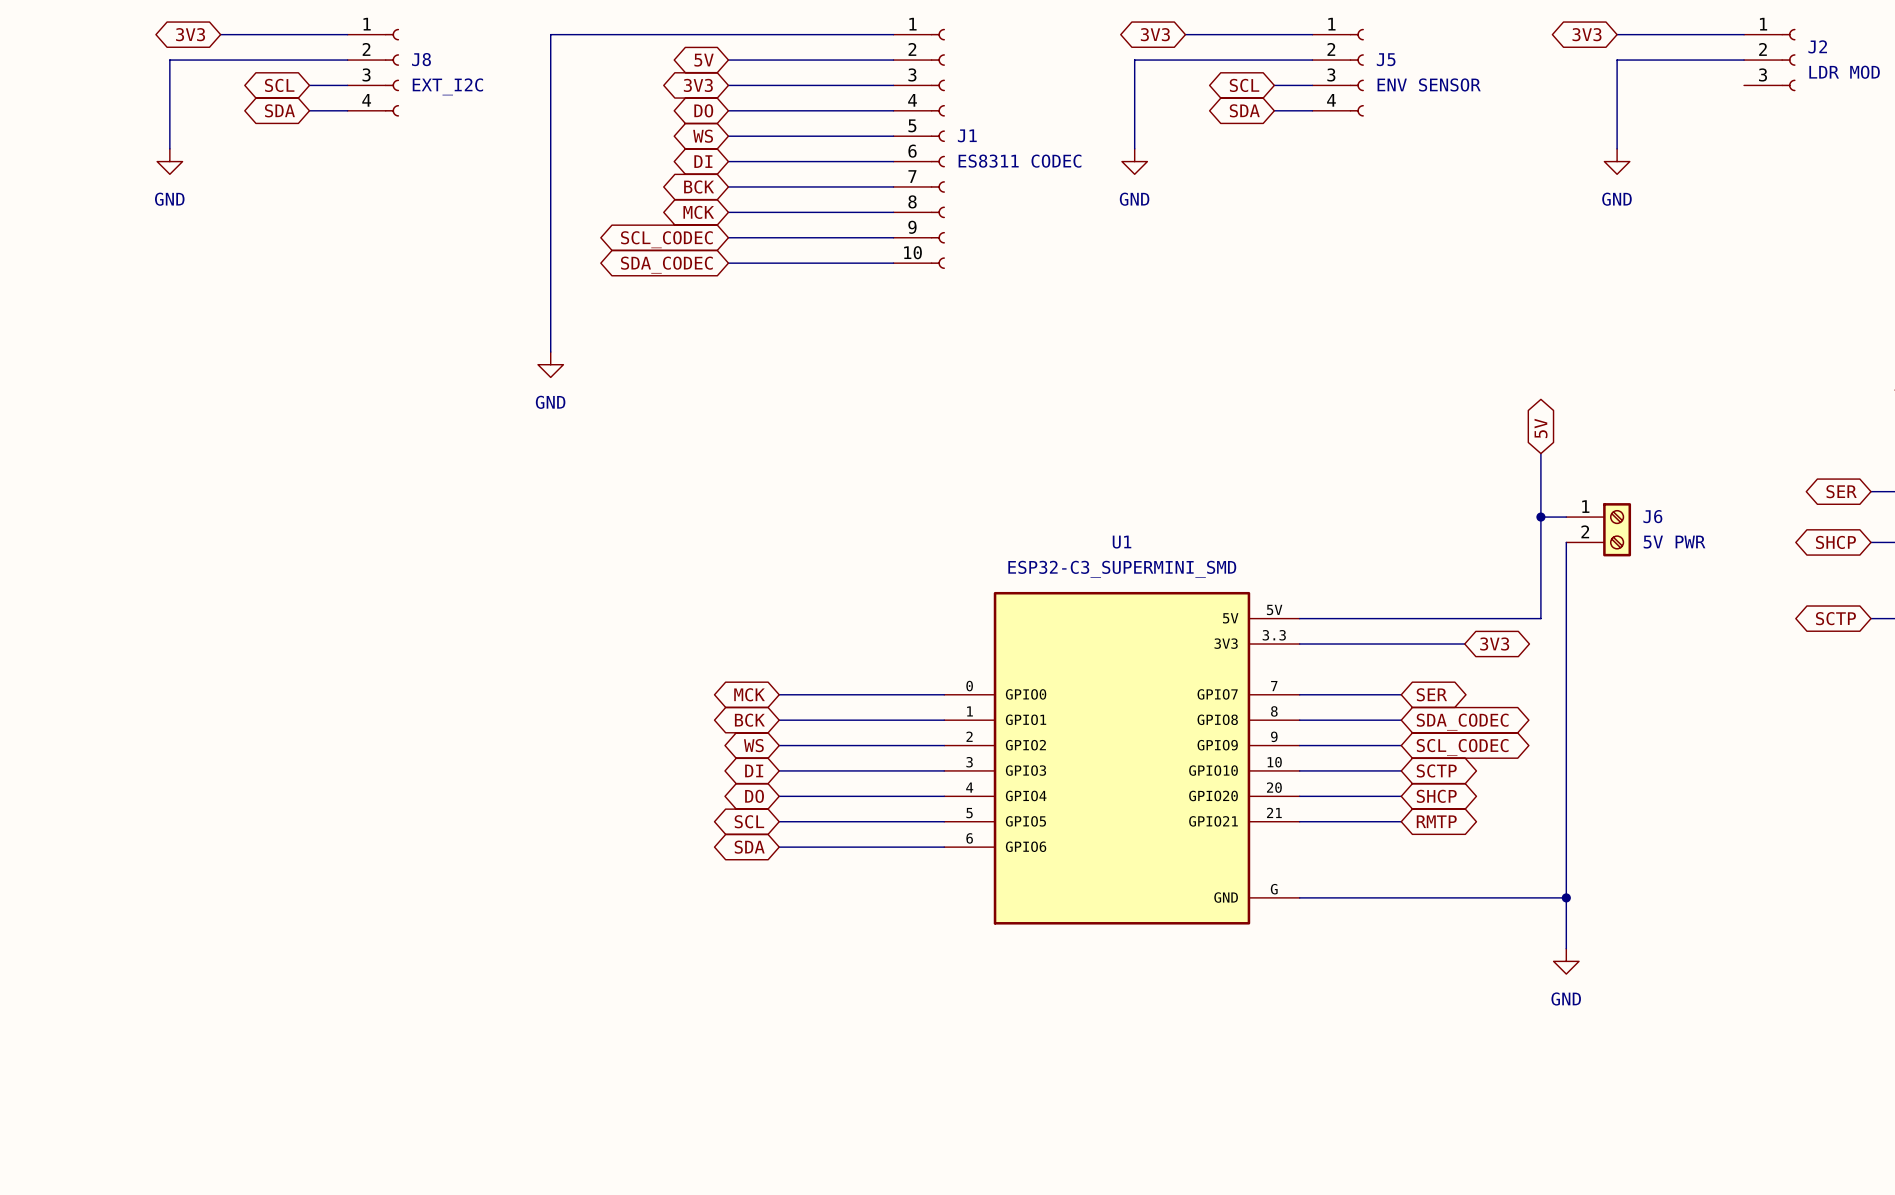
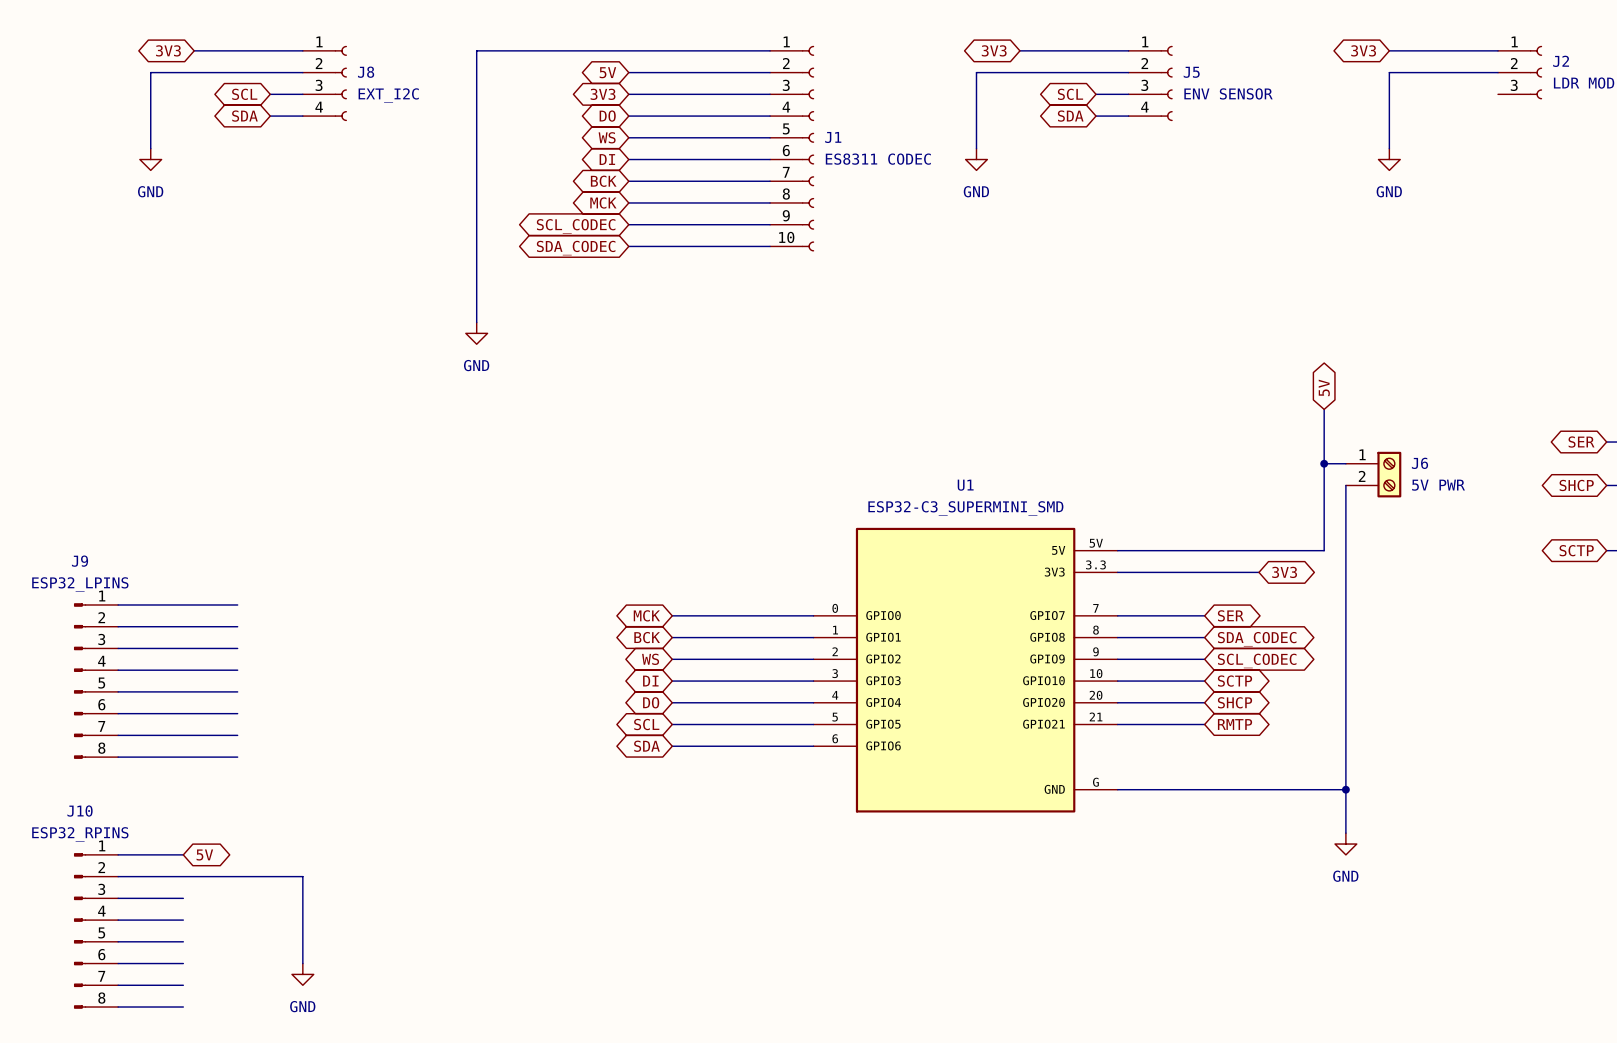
wire: none -> (118, 604) (237, 604)
wire: none -> (118, 626) (237, 626)
wire: none -> (118, 648) (237, 648)
wire: none -> (118, 670) (237, 670)
J9: none -> ESP32_LPINS (96, 681)
wire: none -> (118, 691) (237, 691)
wire: none -> (118, 713) (237, 713)
wire: none -> (118, 735) (237, 735)
wire: none -> (118, 757) (237, 757)
wire: none -> (118, 854) (183, 854)
global label: none -> 5V (204, 855)
wire: none -> (118, 876) (302, 876) (302, 963)
wire: none -> (118, 898) (183, 898)
wire: none -> (118, 920) (183, 920)
J10: none -> ESP32_RPINS (96, 930)
wire: none -> (118, 941) (183, 941)
wire: none -> (118, 963) (183, 963)
power symbol: none -> GND (302, 974)
wire: none -> (118, 985) (183, 985)
wire: none -> (118, 1007) (183, 1007)

